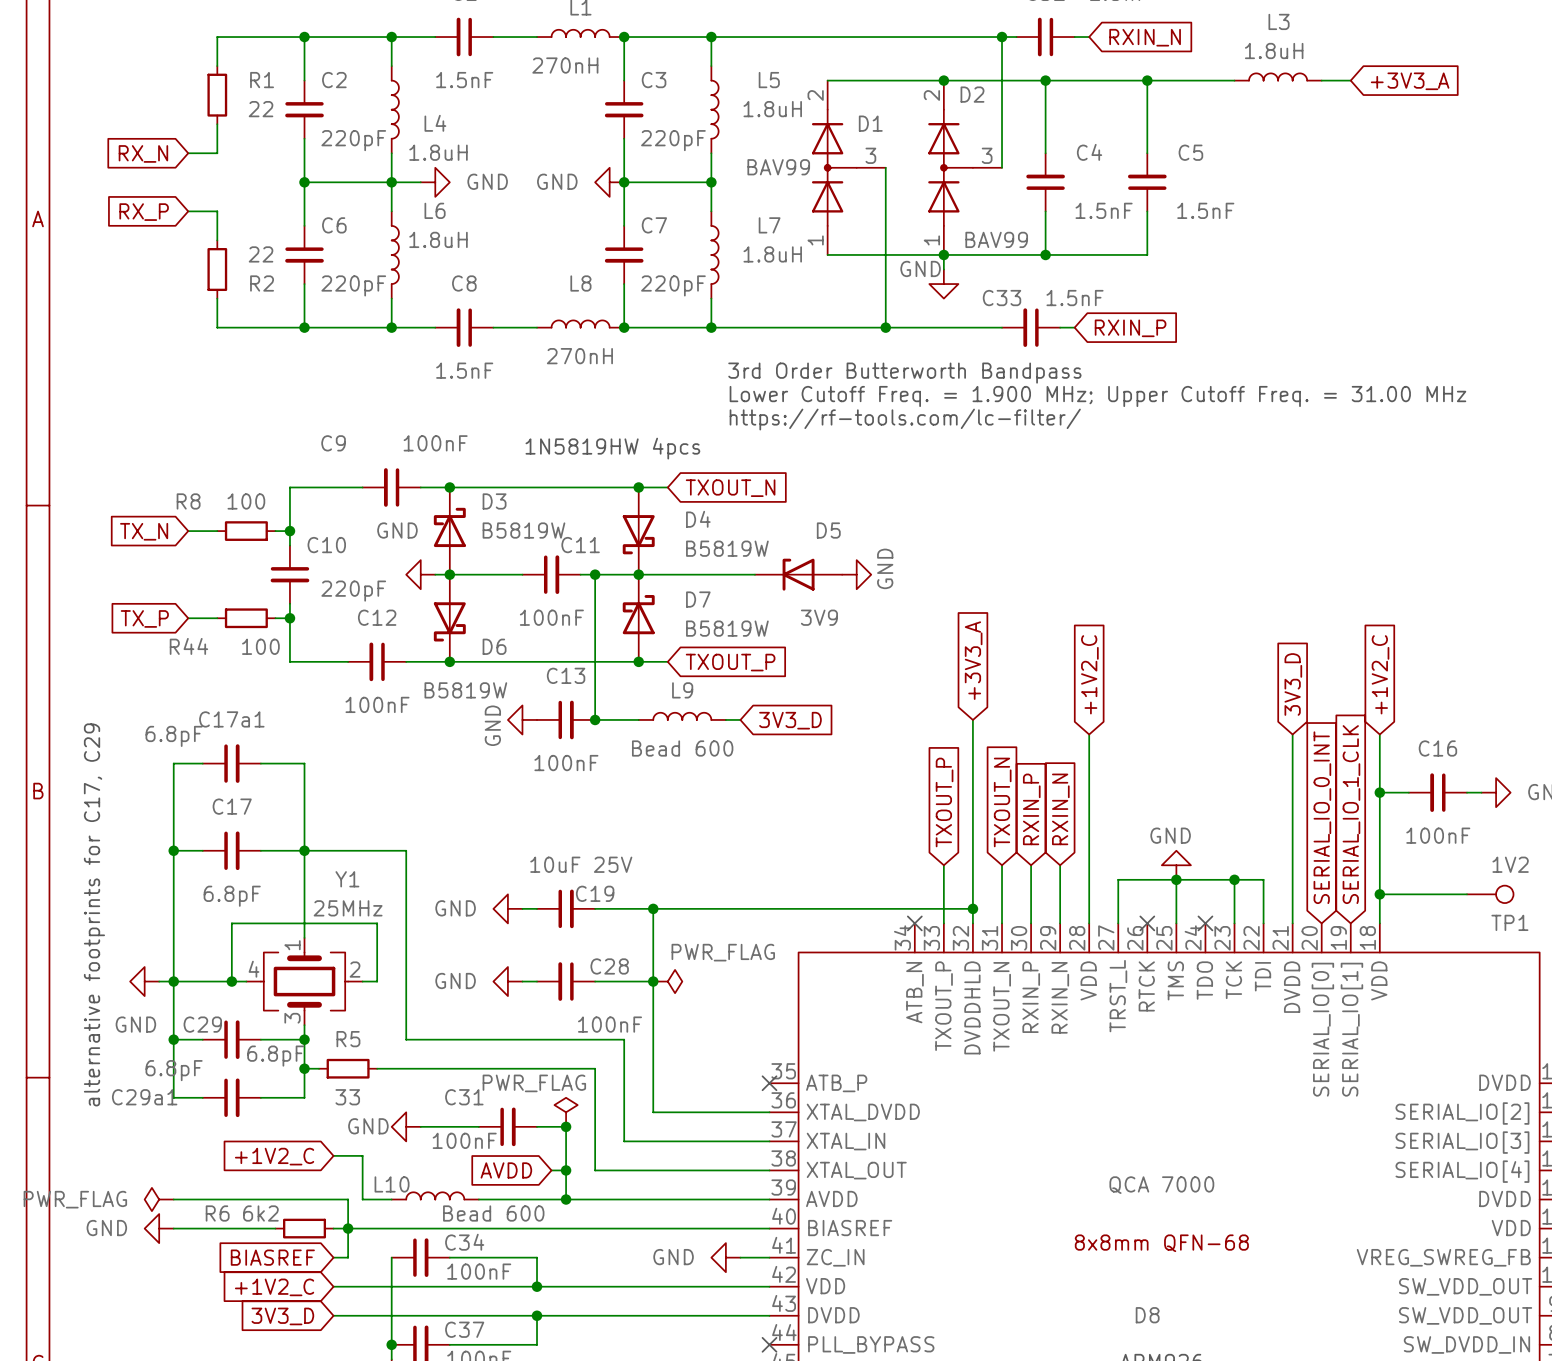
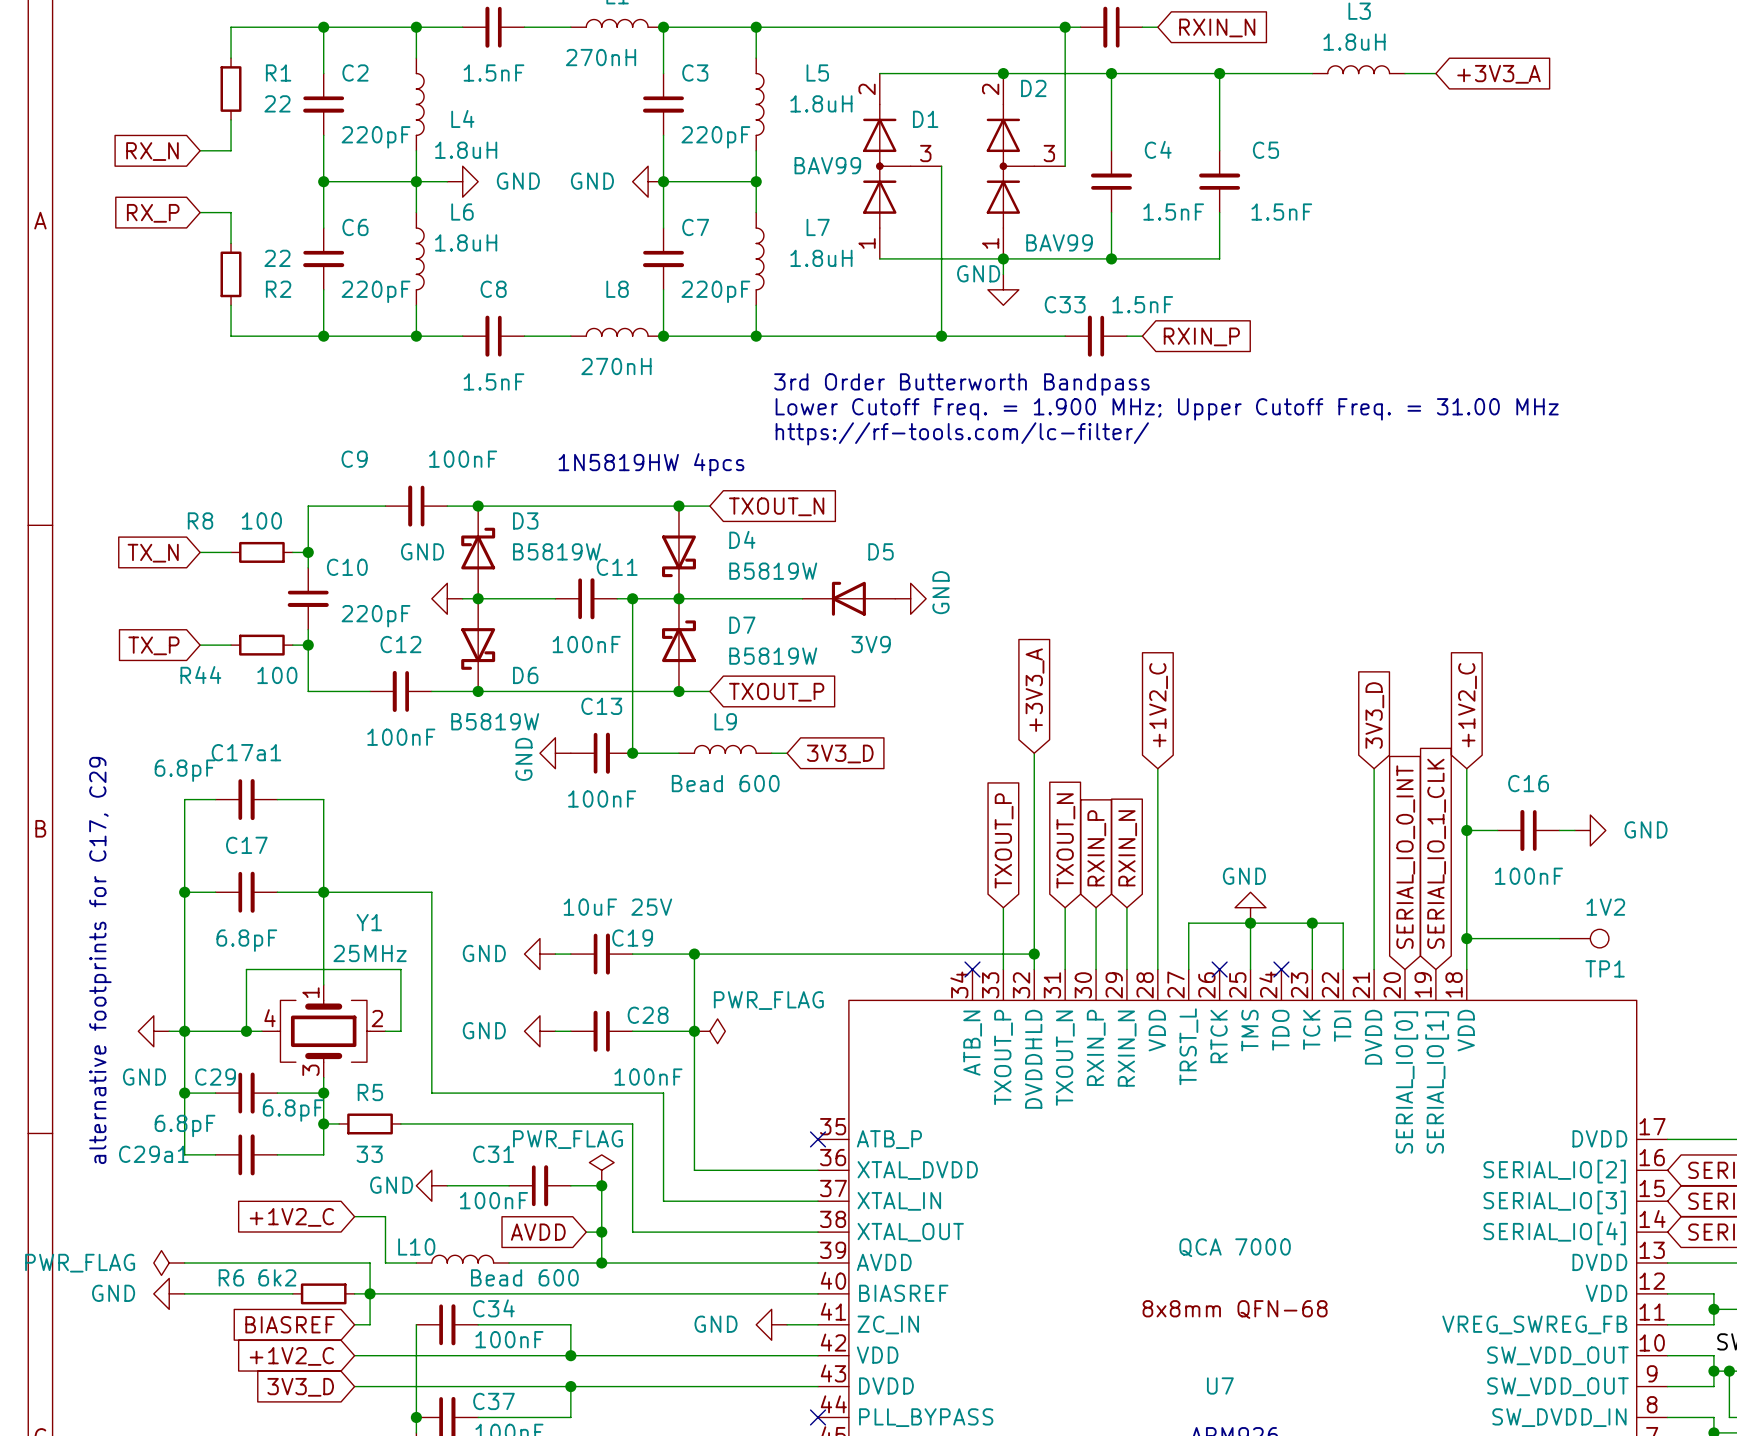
D8 name: D8 (1147, 1315) -> U7 (1220, 1386)

